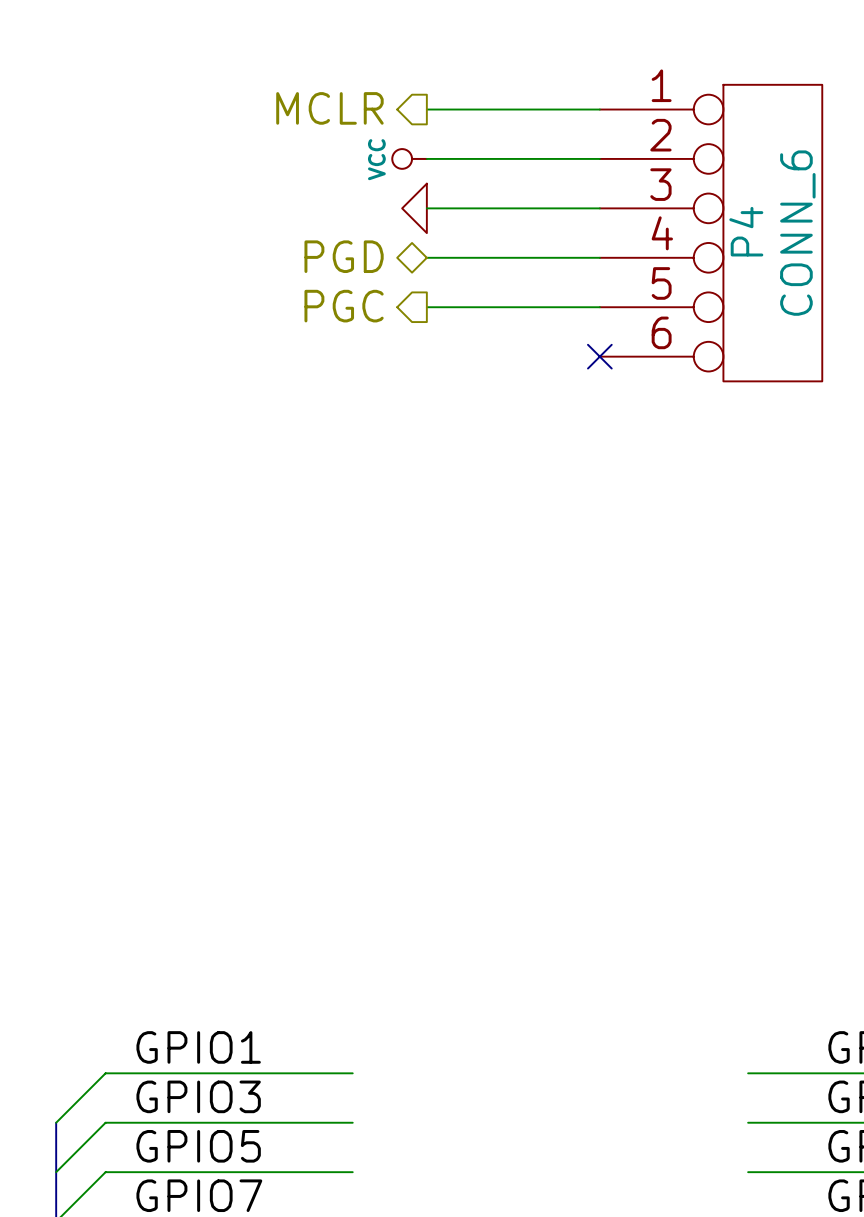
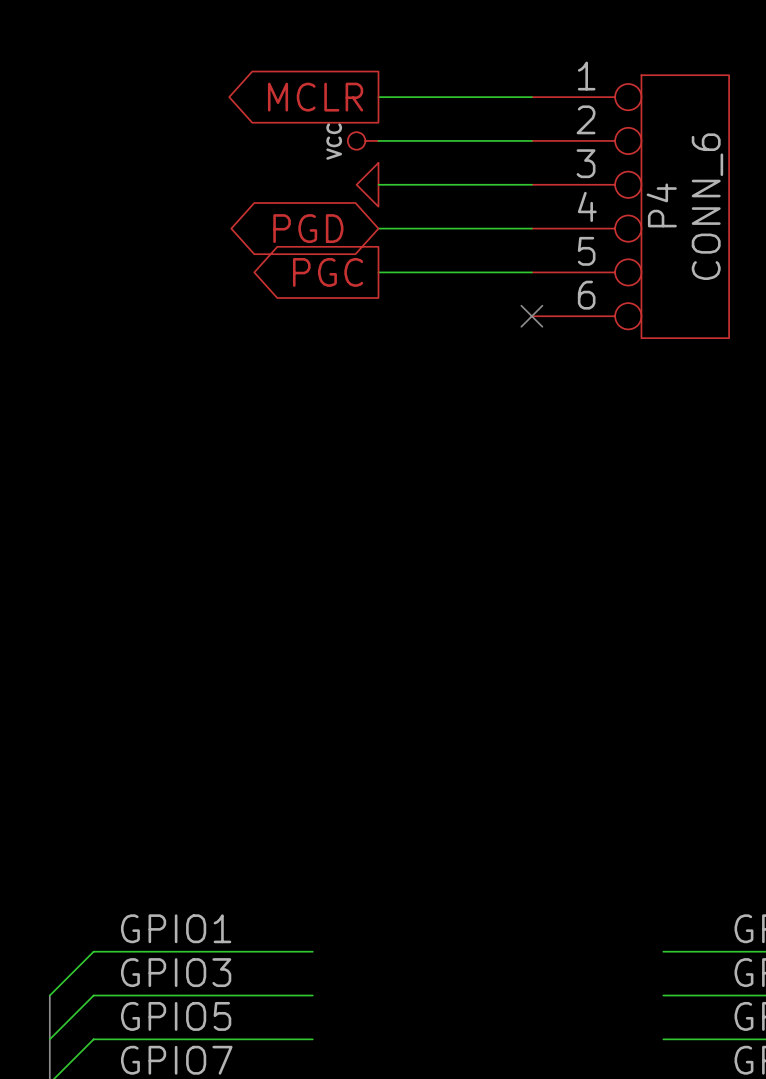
hierarchical label: MCLR (329, 108) -> none
global label: none -> MCLR (315, 97)
hierarchical label: PGD (344, 256) -> none
global label: none -> PGD (308, 228)
hierarchical label: PGC (344, 306) -> none
global label: none -> PGC (328, 272)

